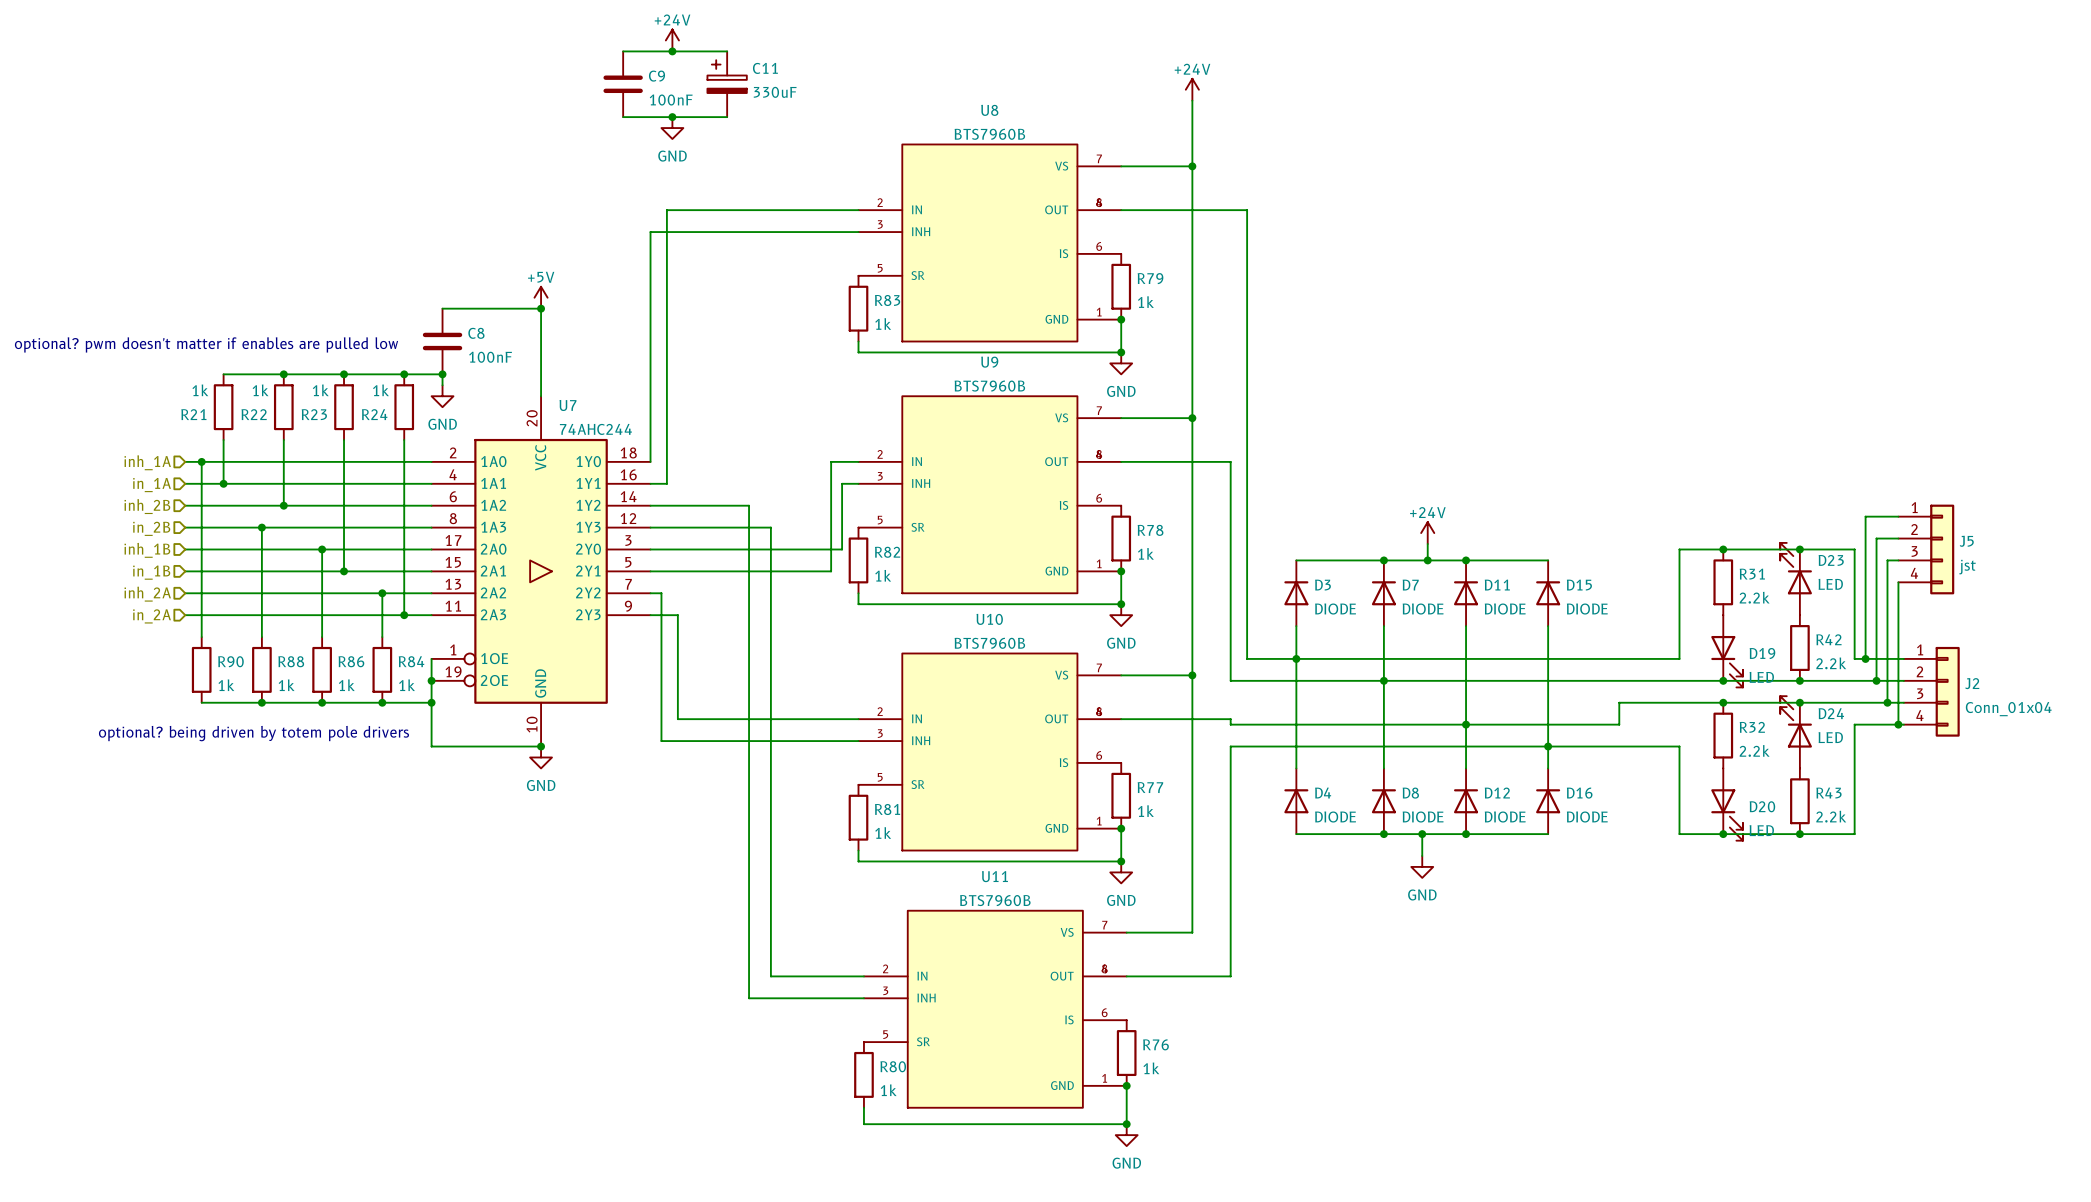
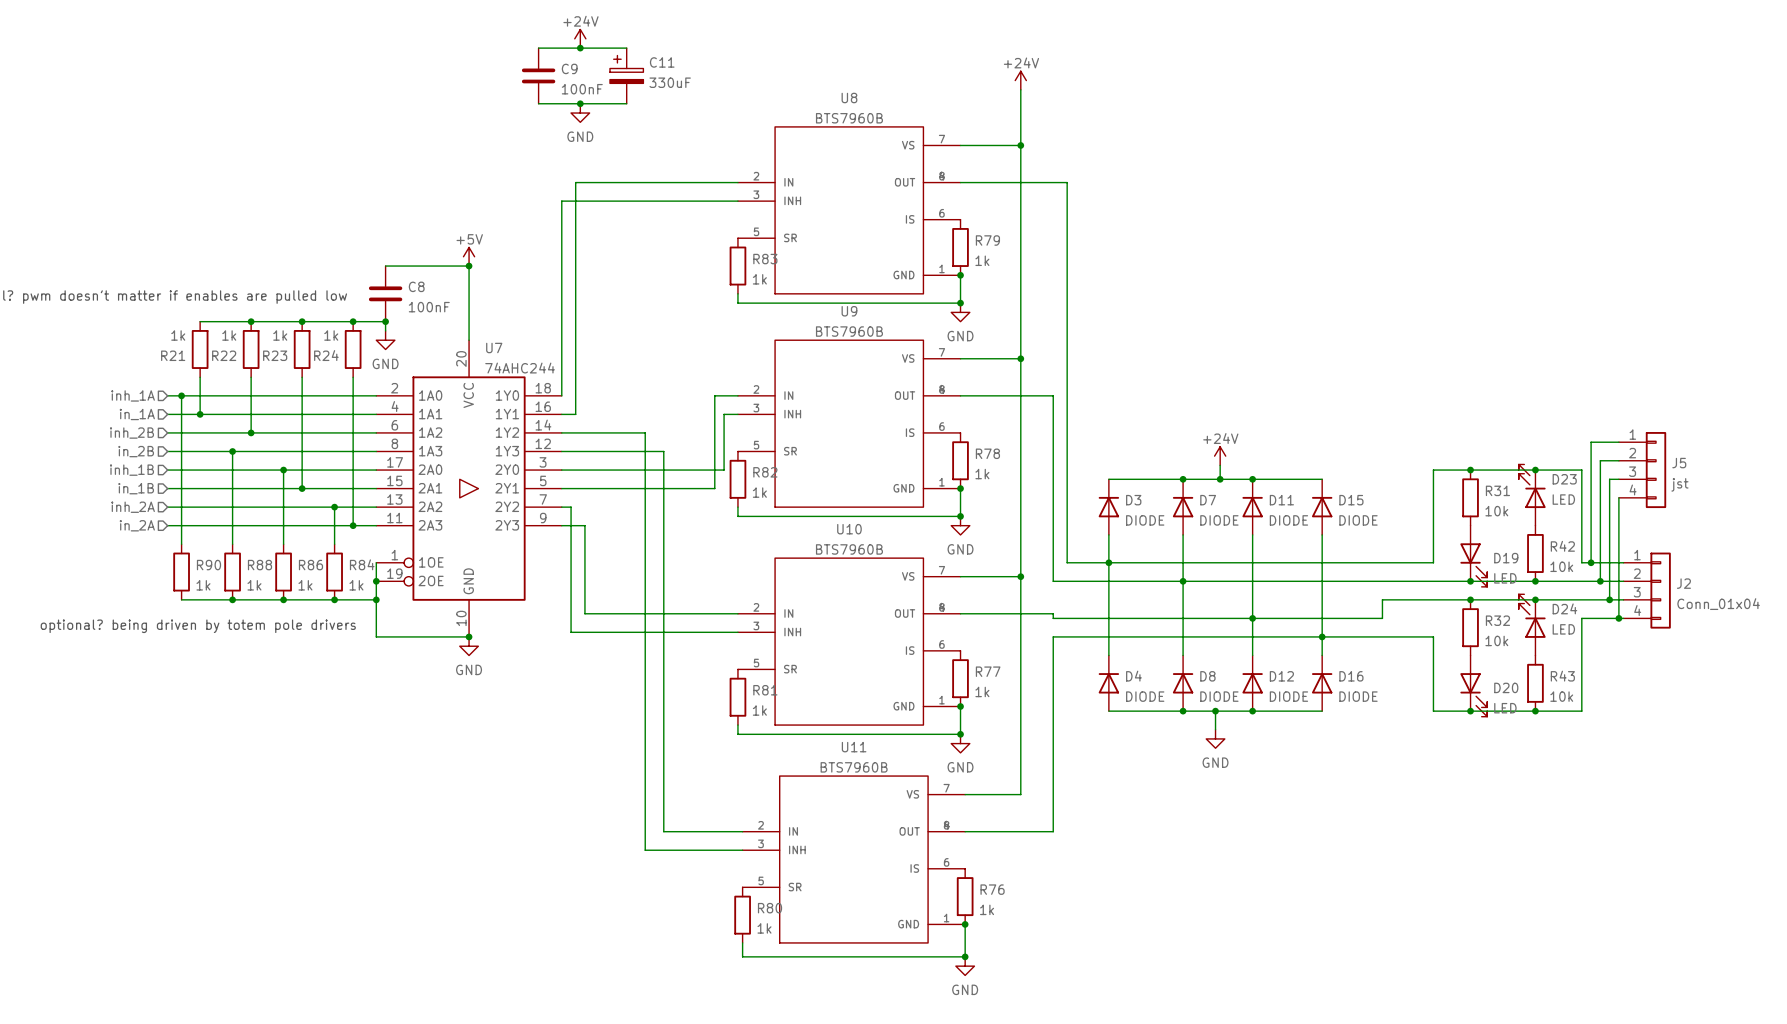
R31 value: 2.2k (1754, 597) -> 10k (1496, 511)
R42 value: 2.2k (1831, 663) -> 10k (1561, 566)
R32 value: 2.2k (1754, 750) -> 10k (1496, 640)
R43 value: 2.2k (1831, 816) -> 10k (1561, 696)

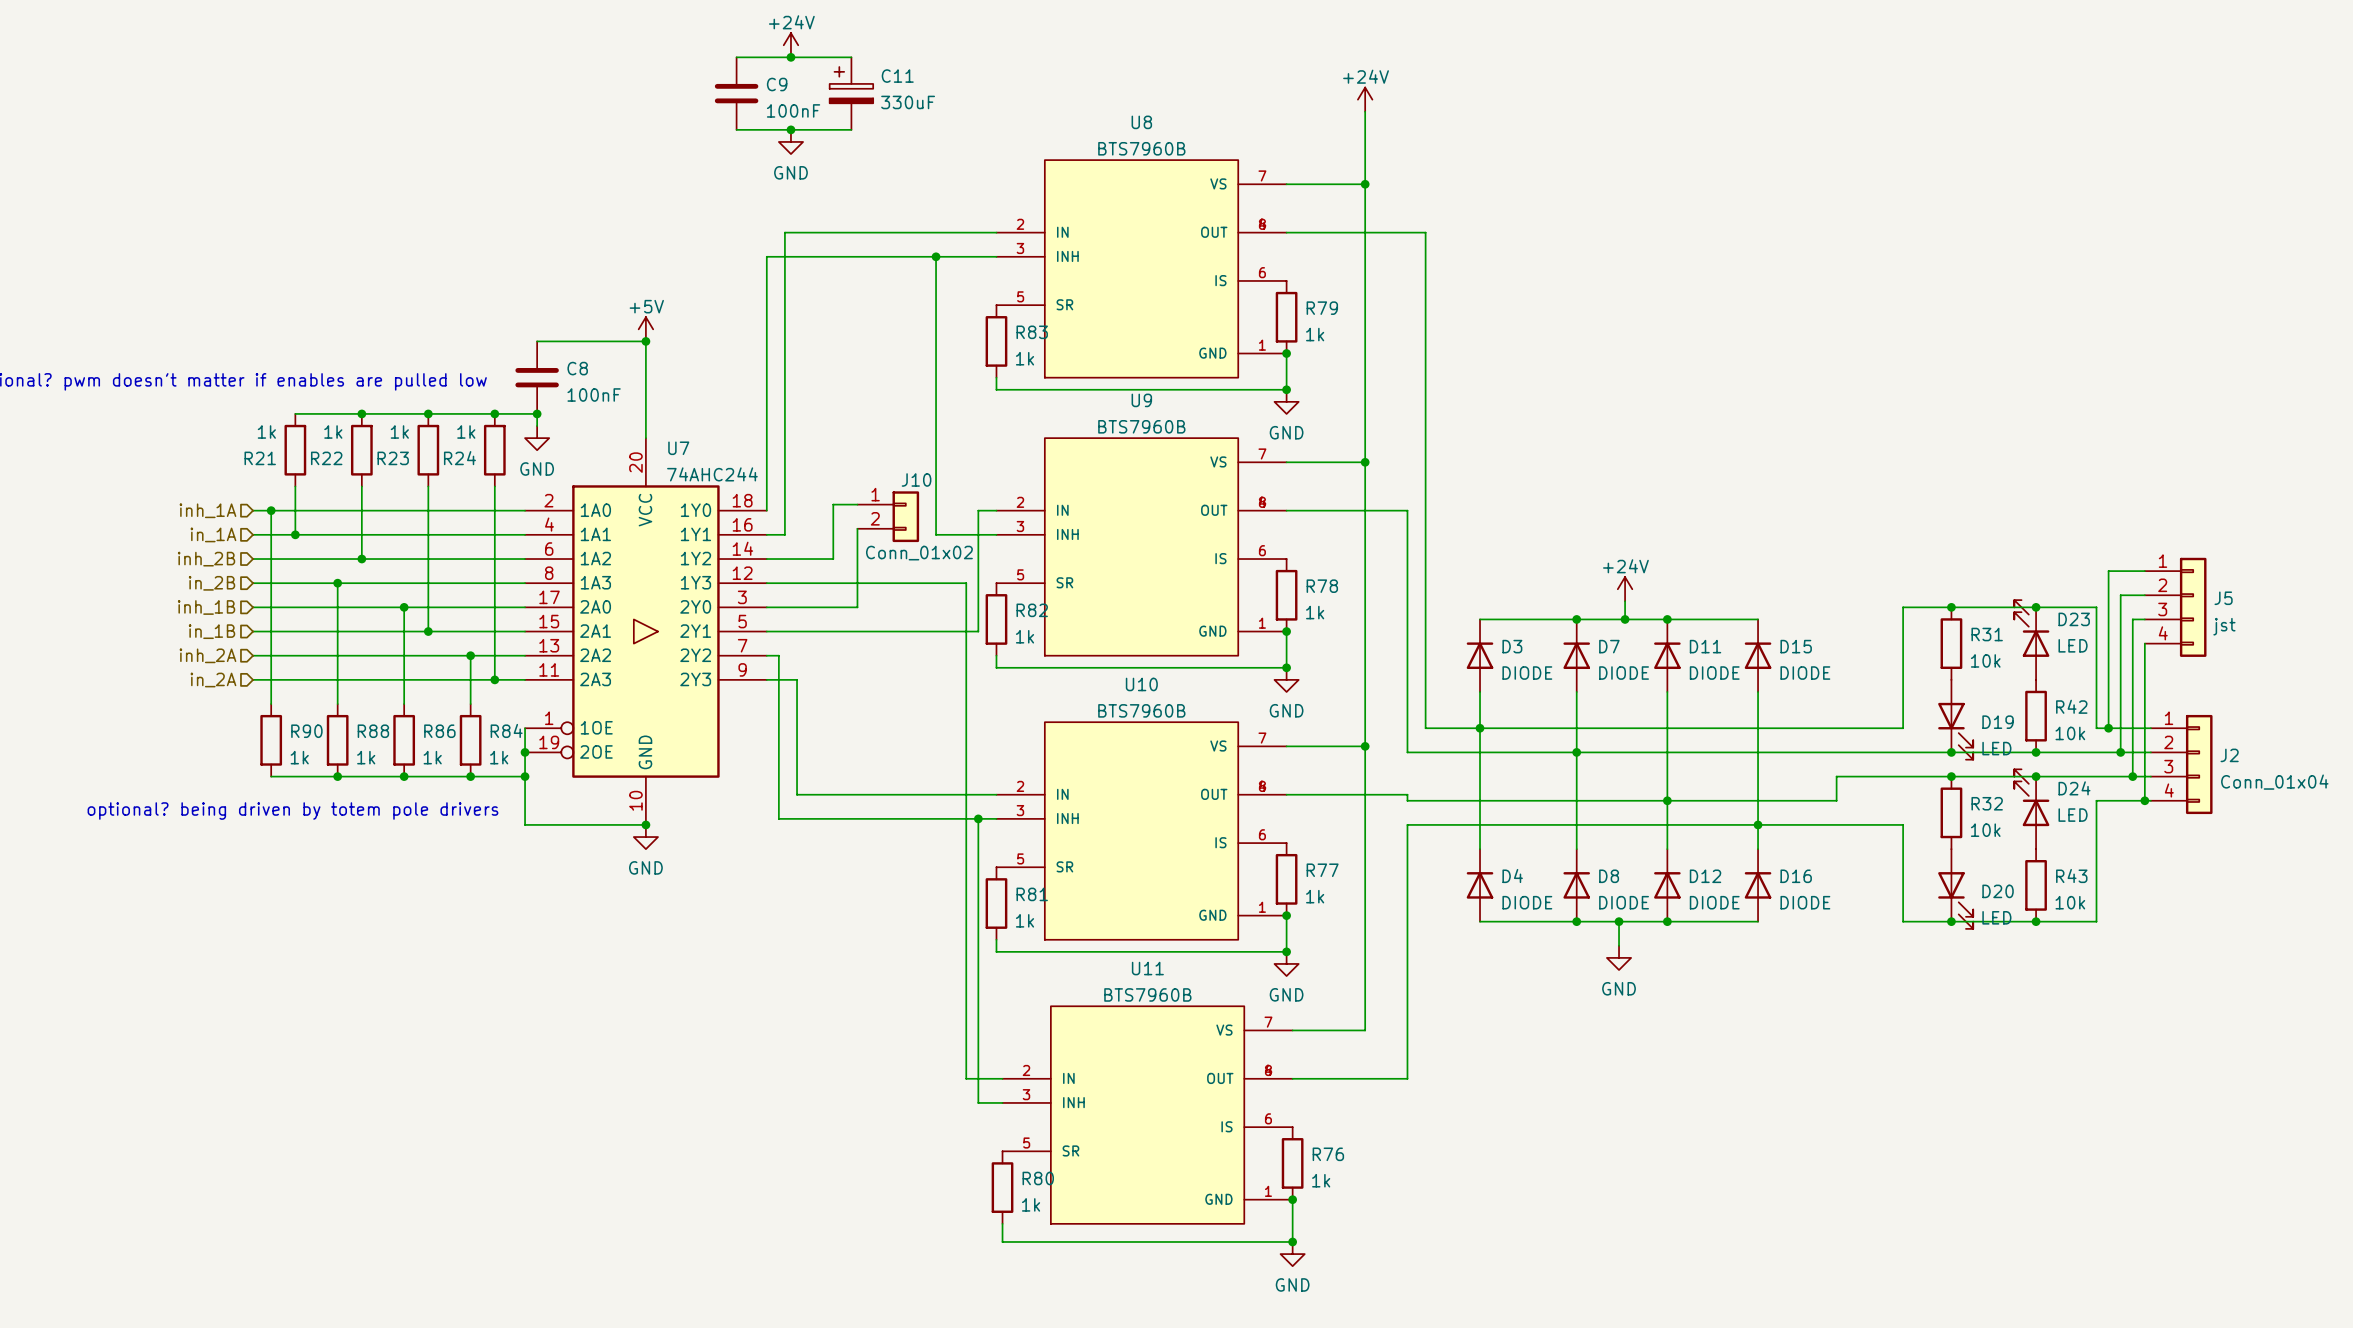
wire: none -> (936, 256) (936, 534) (978, 534) (978, 510)
junction: none -> (936, 256)
wire: none -> (857, 504) (833, 504) (833, 559)
wire: (724, 395) (714, 395) (714, 451) -> (899, 583) (966, 583)
J10: none -> Conn_01x02 (888, 516)
wire: (612, 432) (645, 432) (645, 850) (724, 850) -> (978, 818) (978, 1102)
wire: (663, 451) (663, 831) (714, 831) -> (978, 607) (978, 631) (966, 631) (966, 1078)
wire: (631, 470) (724, 470) -> (857, 607) (857, 528)
junction: none -> (978, 818)

